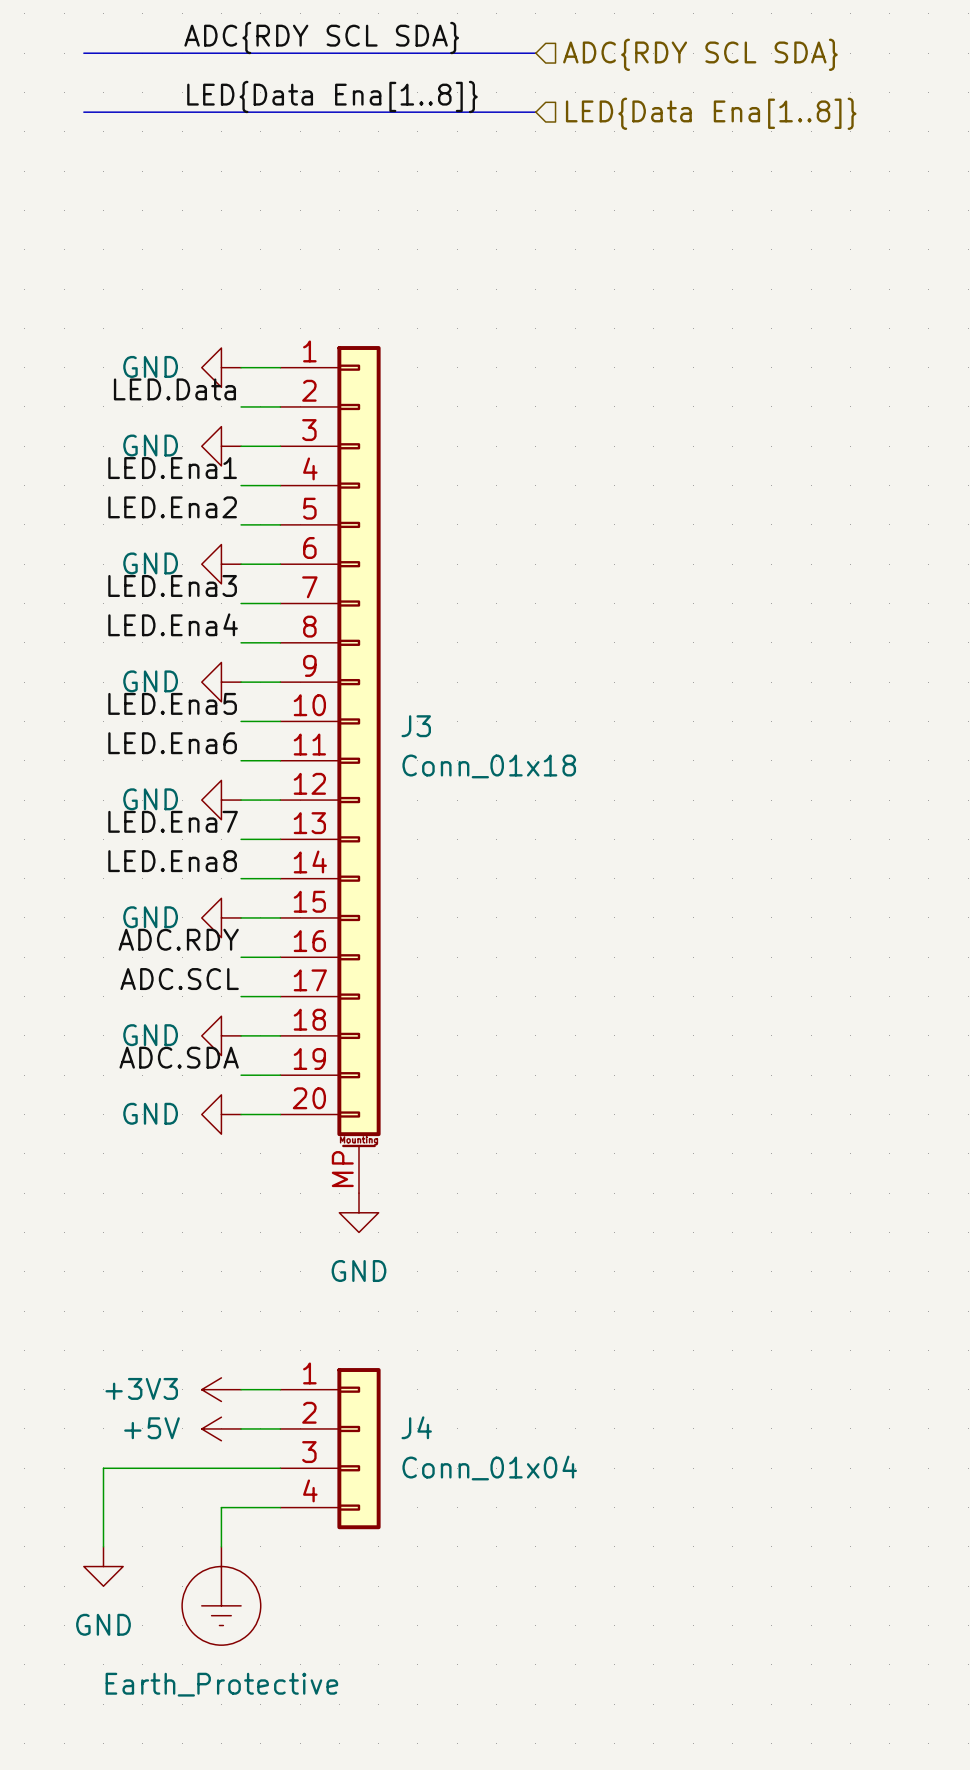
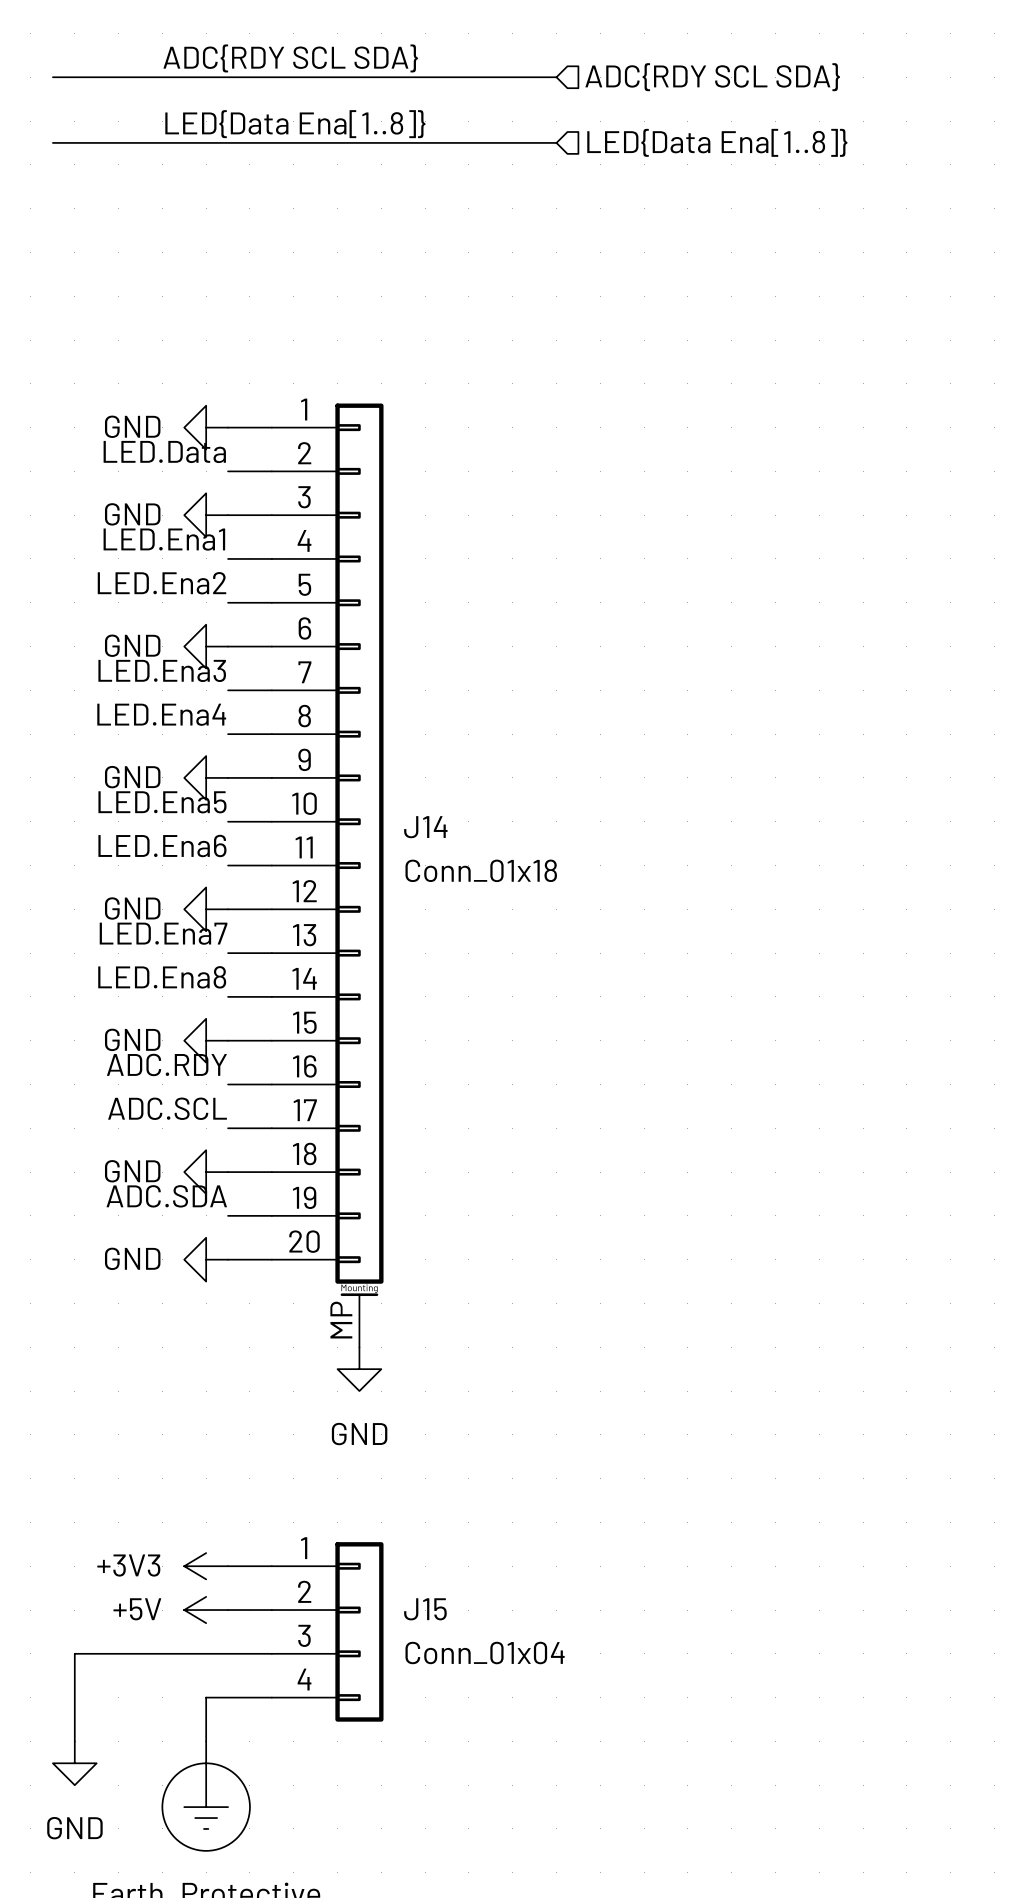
J3 name: J3 (416, 726) -> J14 (425, 827)
J4 name: J4 (416, 1427) -> J15 (425, 1609)

